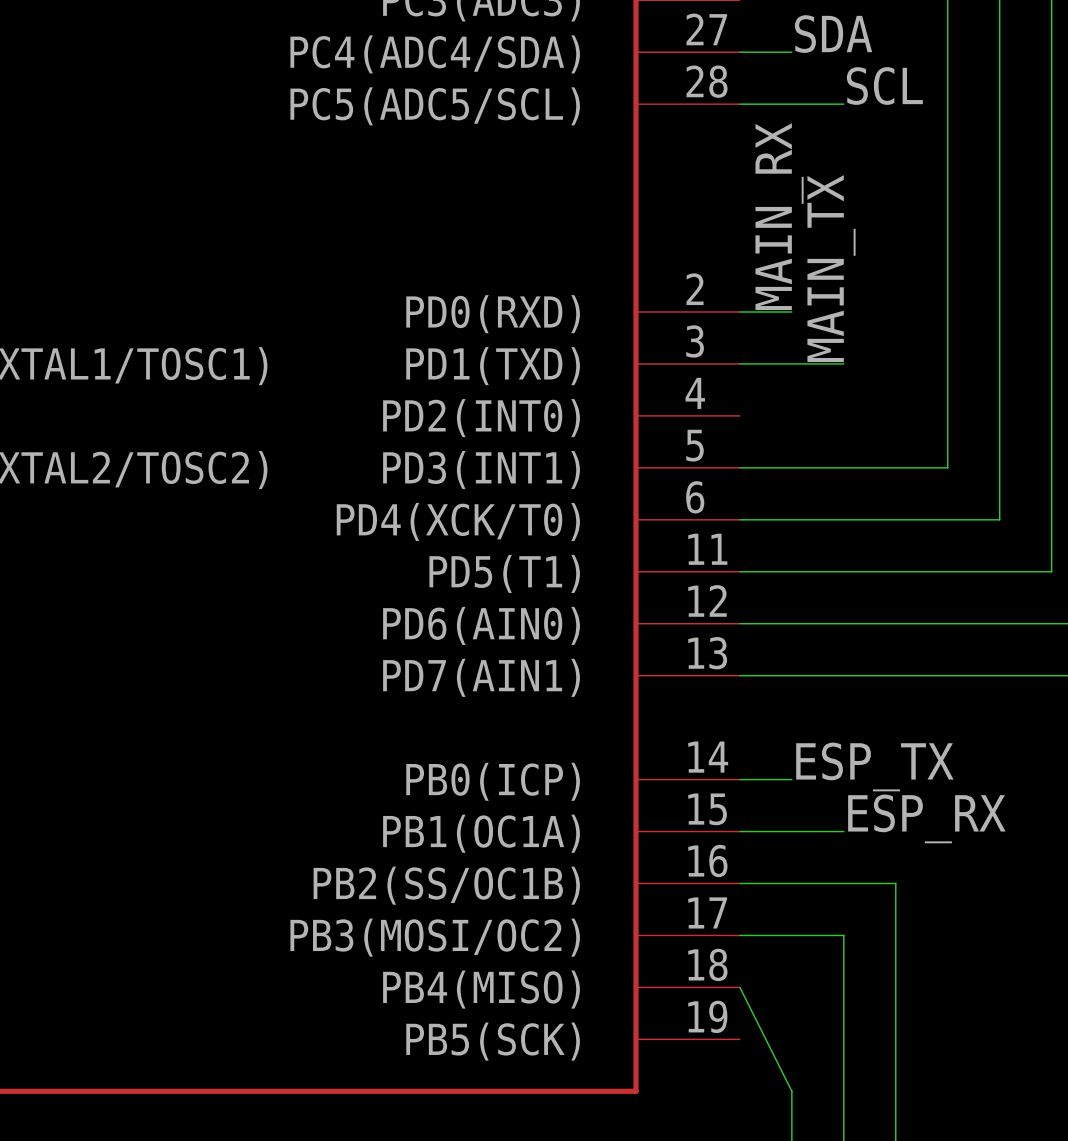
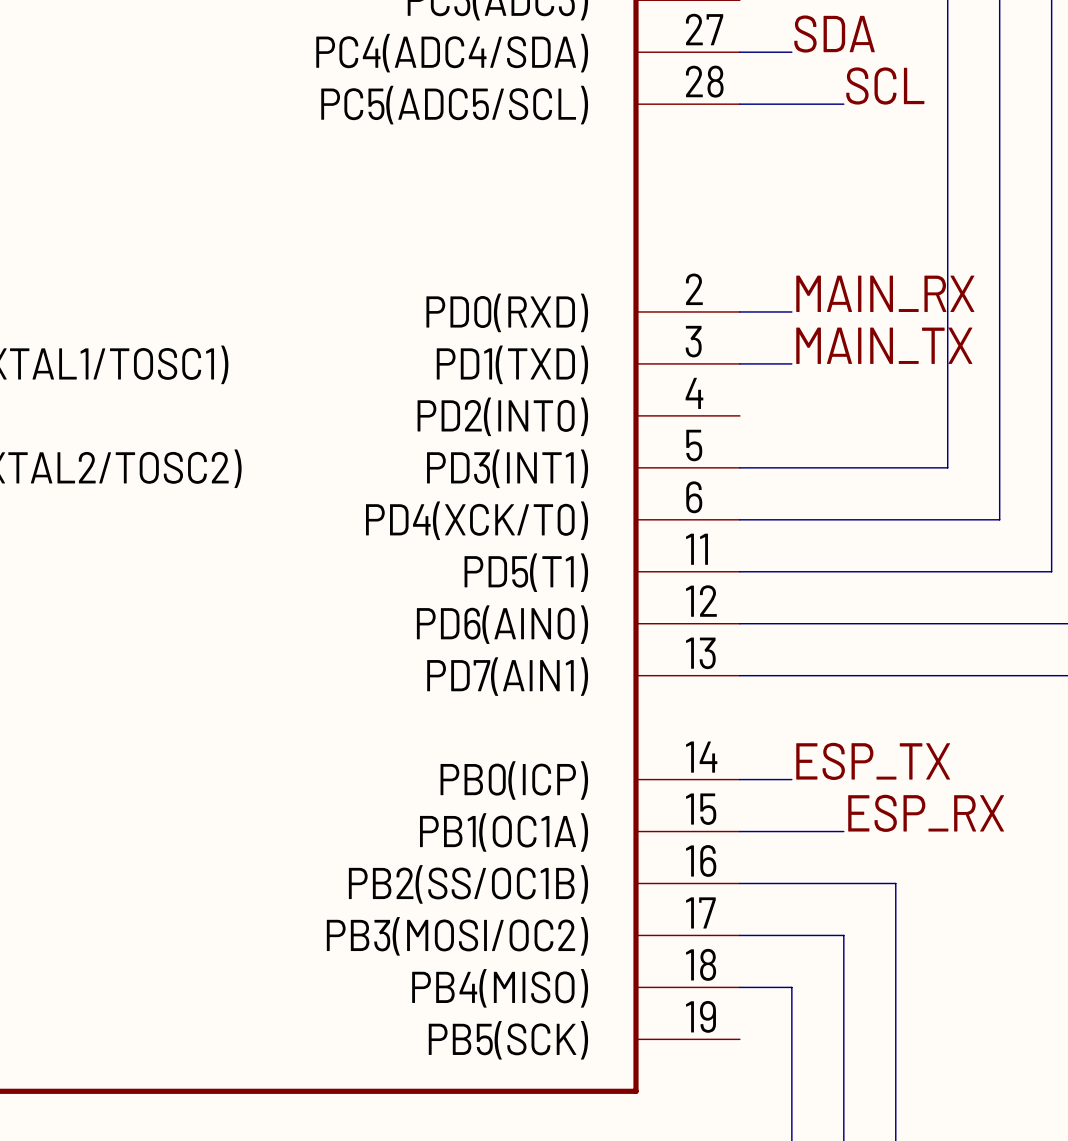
label rotation: 0° (779, 216) -> 90° clockwise (885, 293)
label rotation: 0° (831, 268) -> 90° clockwise (884, 345)
wire: (791, 363) (843, 363) -> none
wire: (739, 987) (791, 1091) -> (739, 987) (791, 987) (791, 1091)

